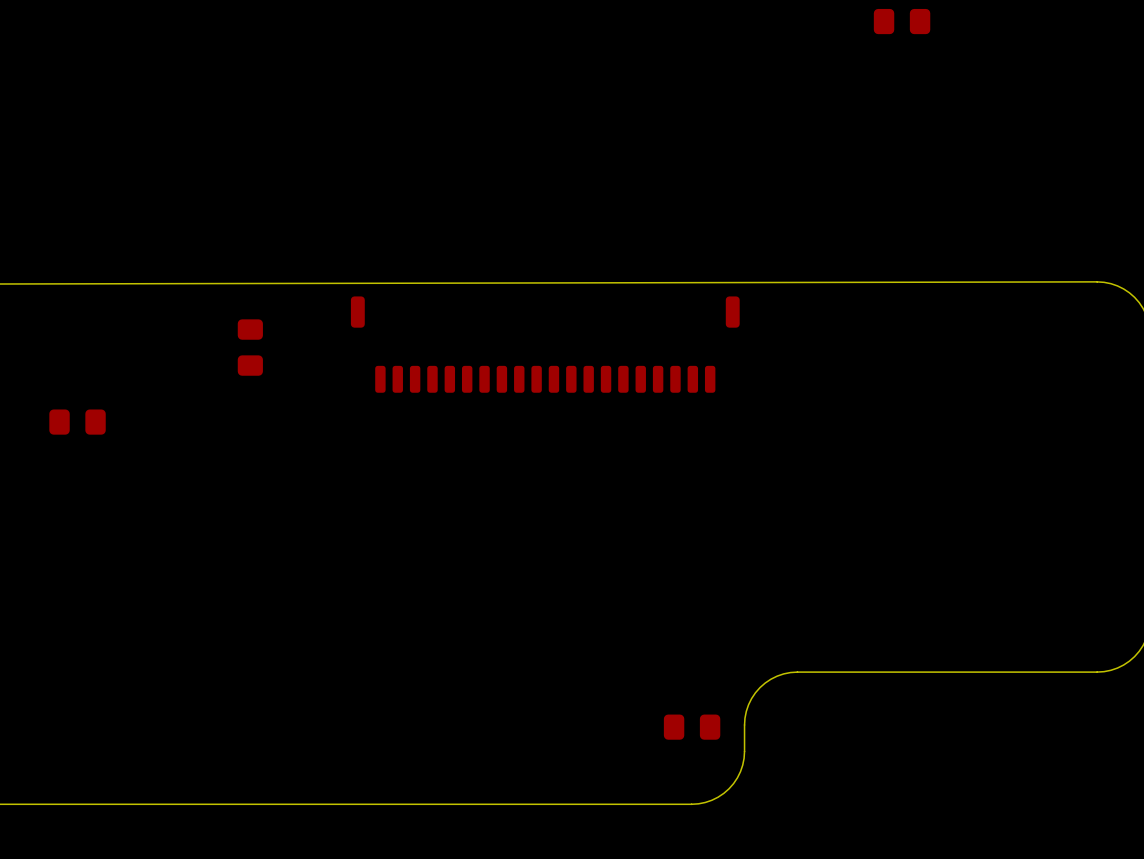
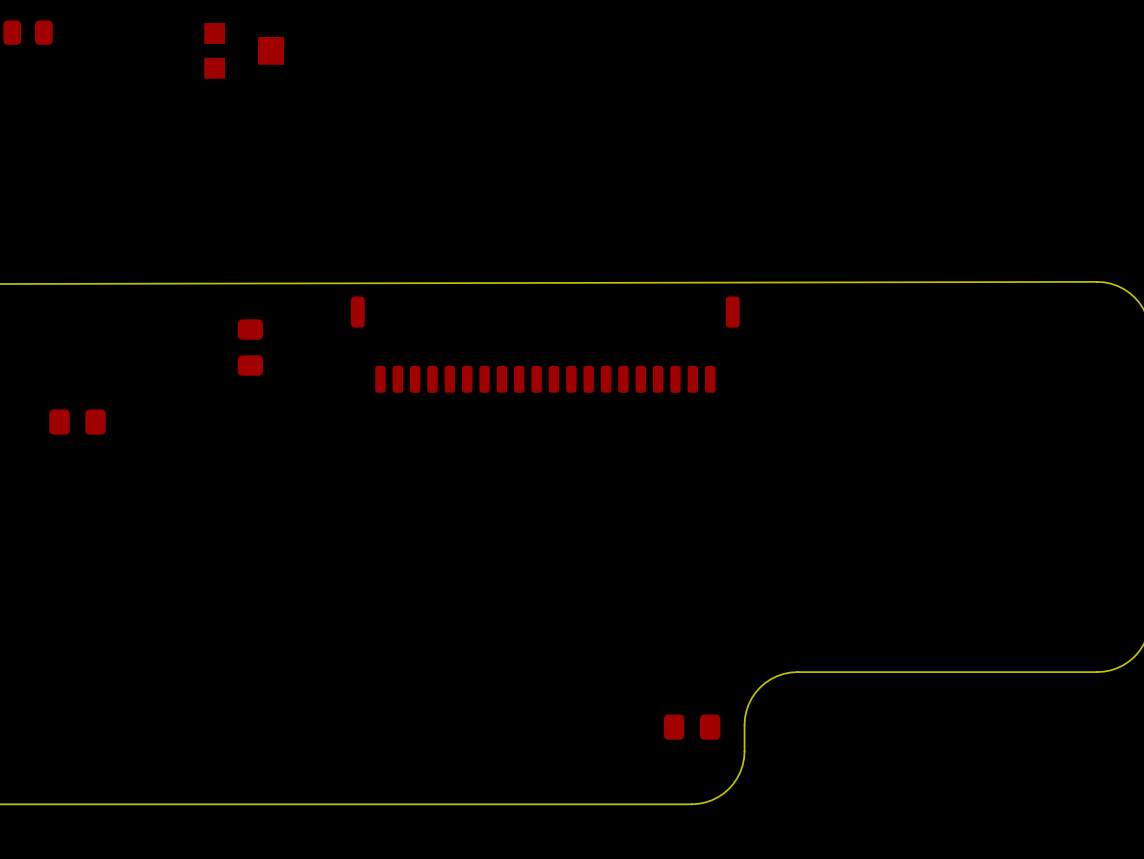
part: (902, 21) -> none
part: none -> (28, 32)
part: none -> (244, 50)

